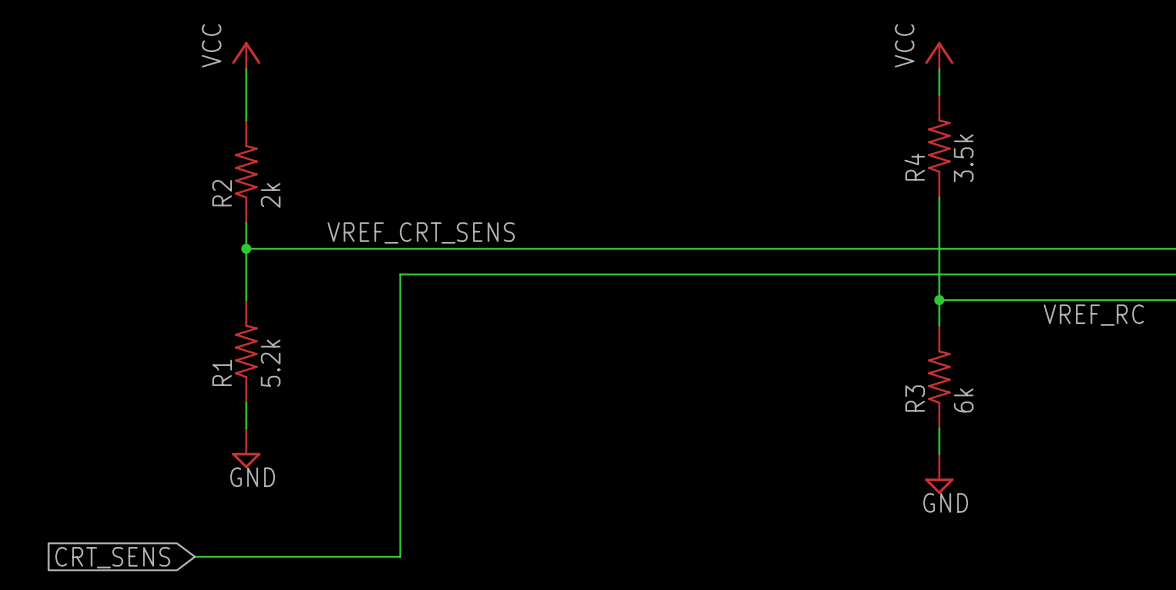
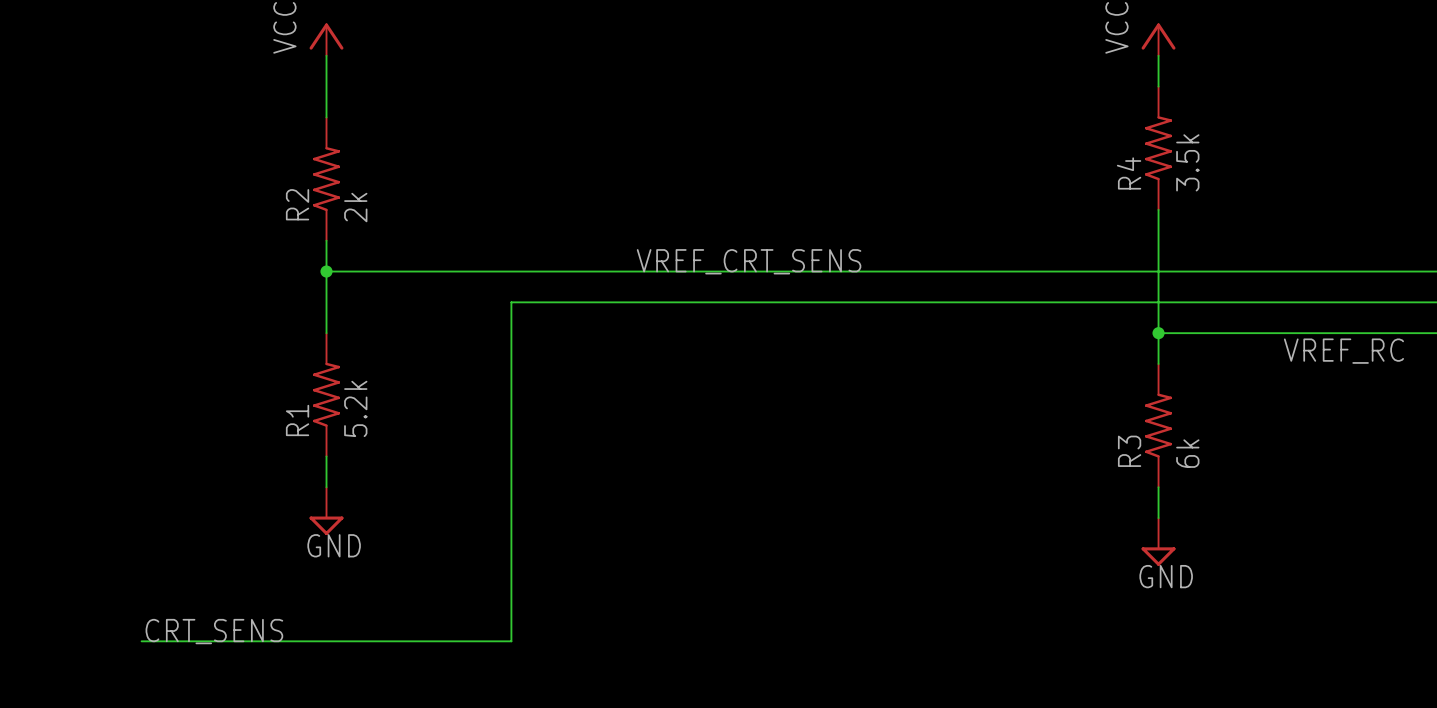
label position: VREF_CRT_SENS (421, 232) -> VREF_CRT_SENS (749, 261)
label: none -> CRT_SENS (214, 631)
wire: none -> (141, 641) (264, 641)
global label: CRT_SENS (112, 557) -> none

